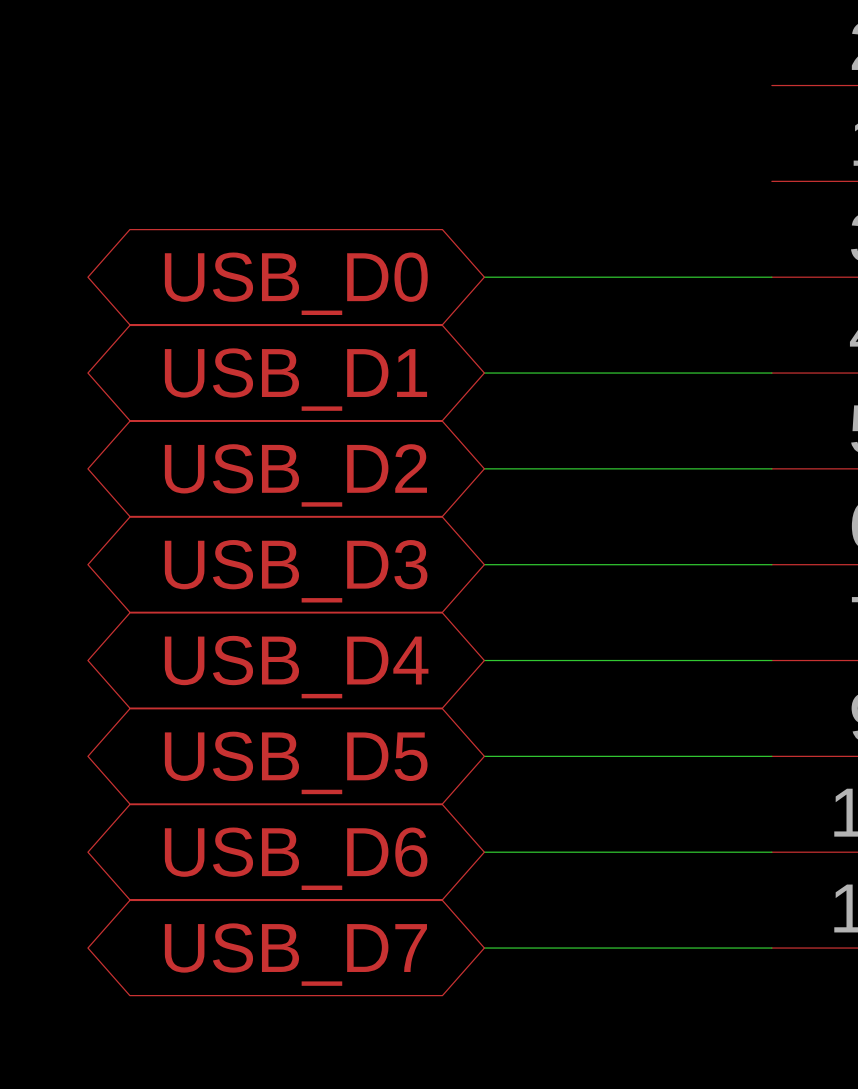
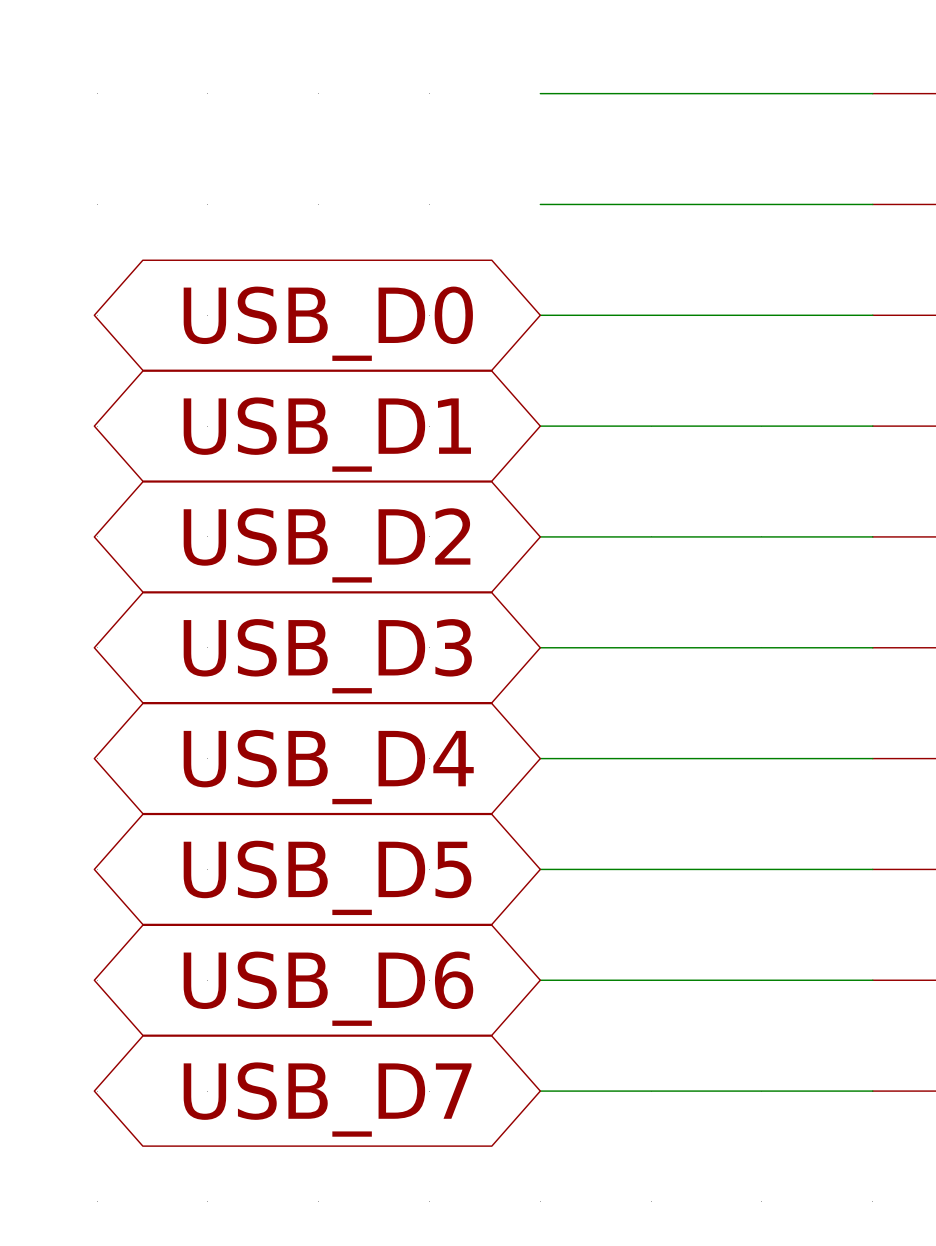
wire: none -> (540, 93) (872, 93)
wire: none -> (540, 204) (872, 204)

